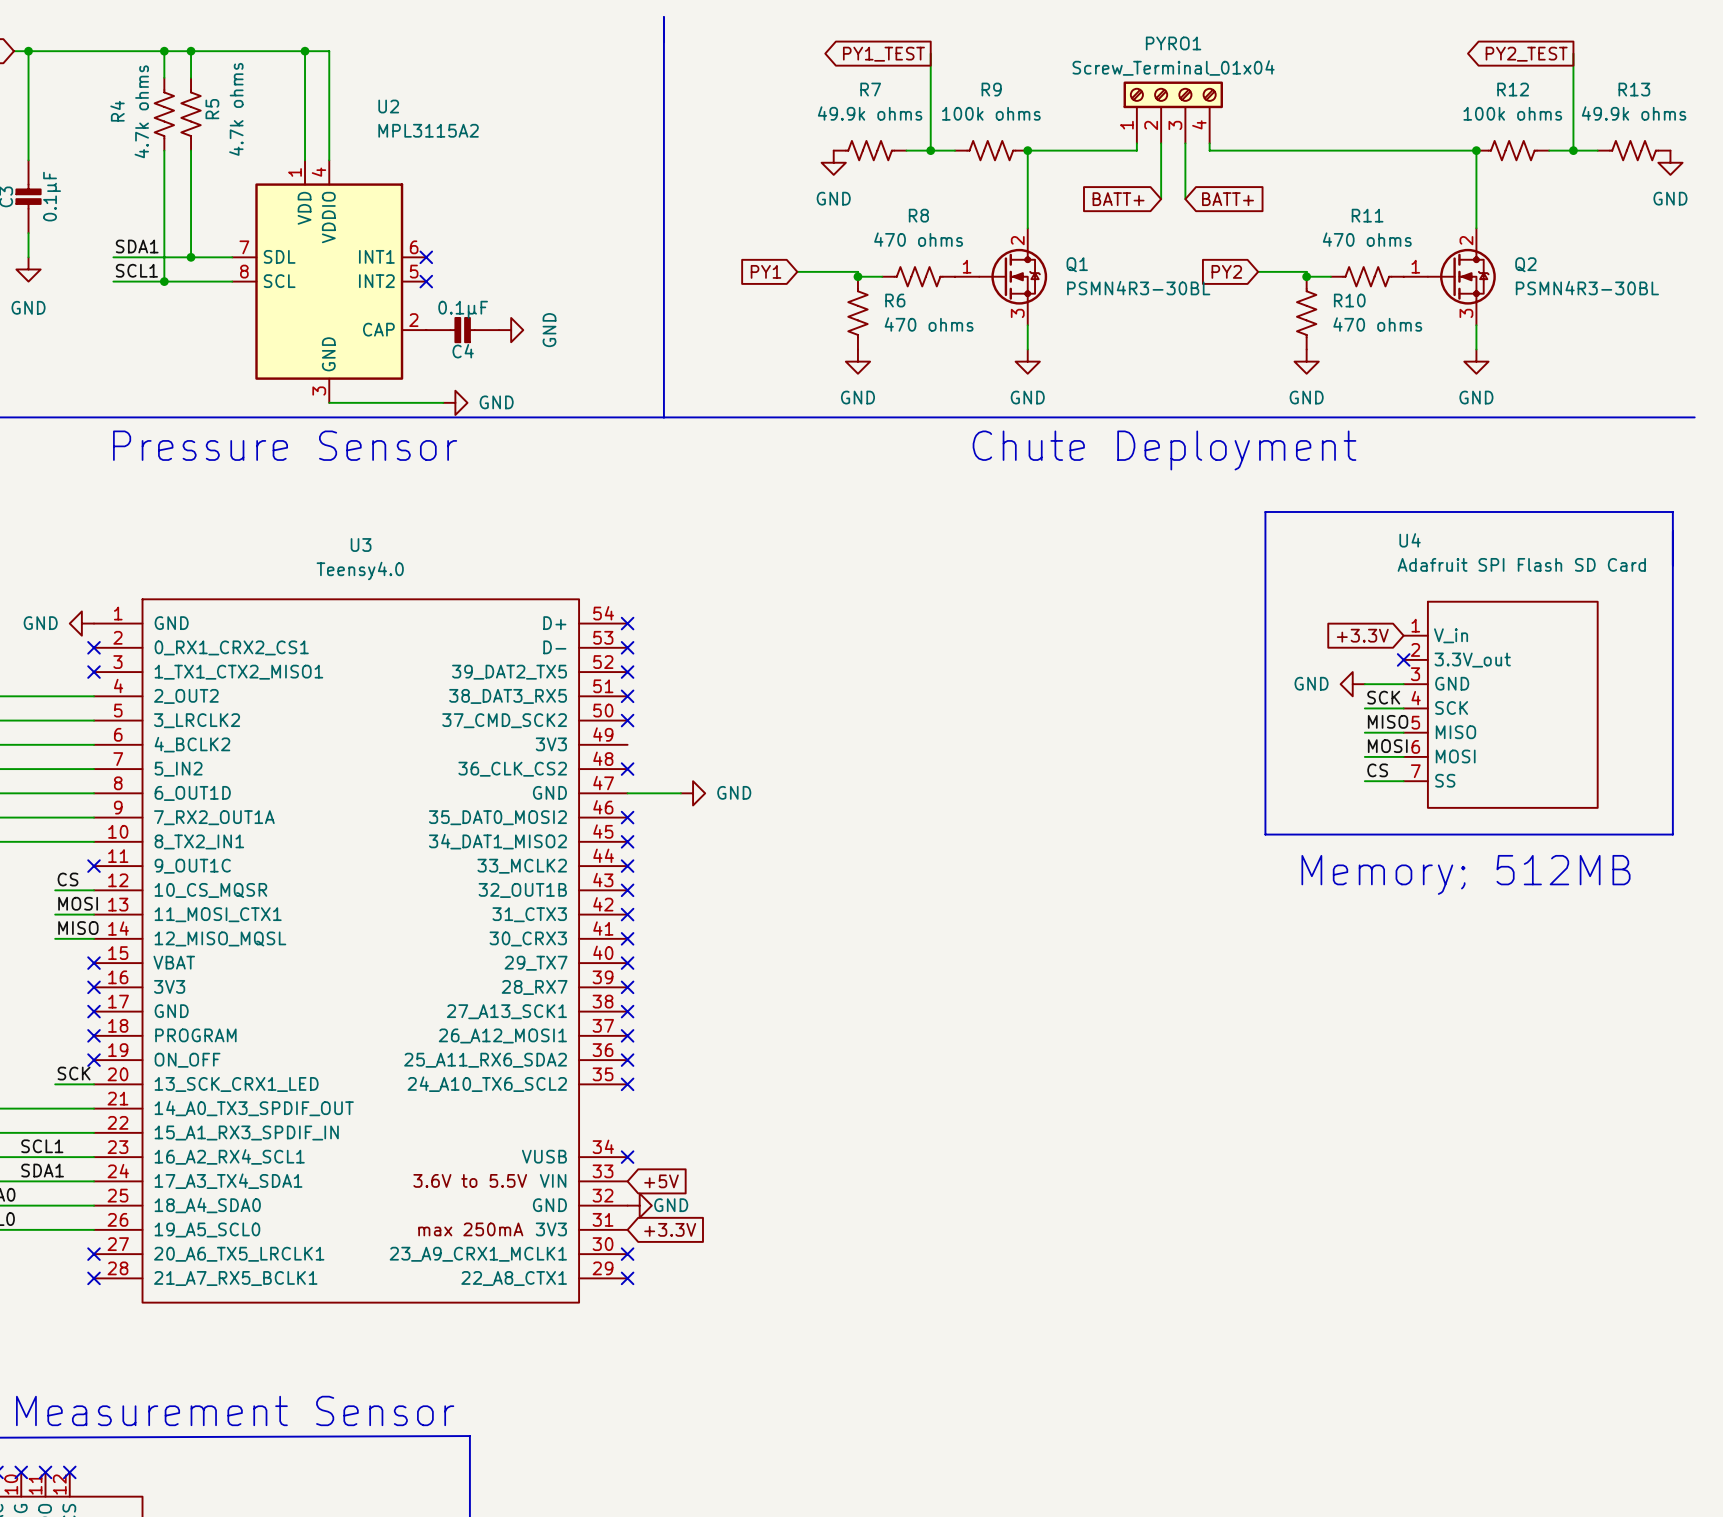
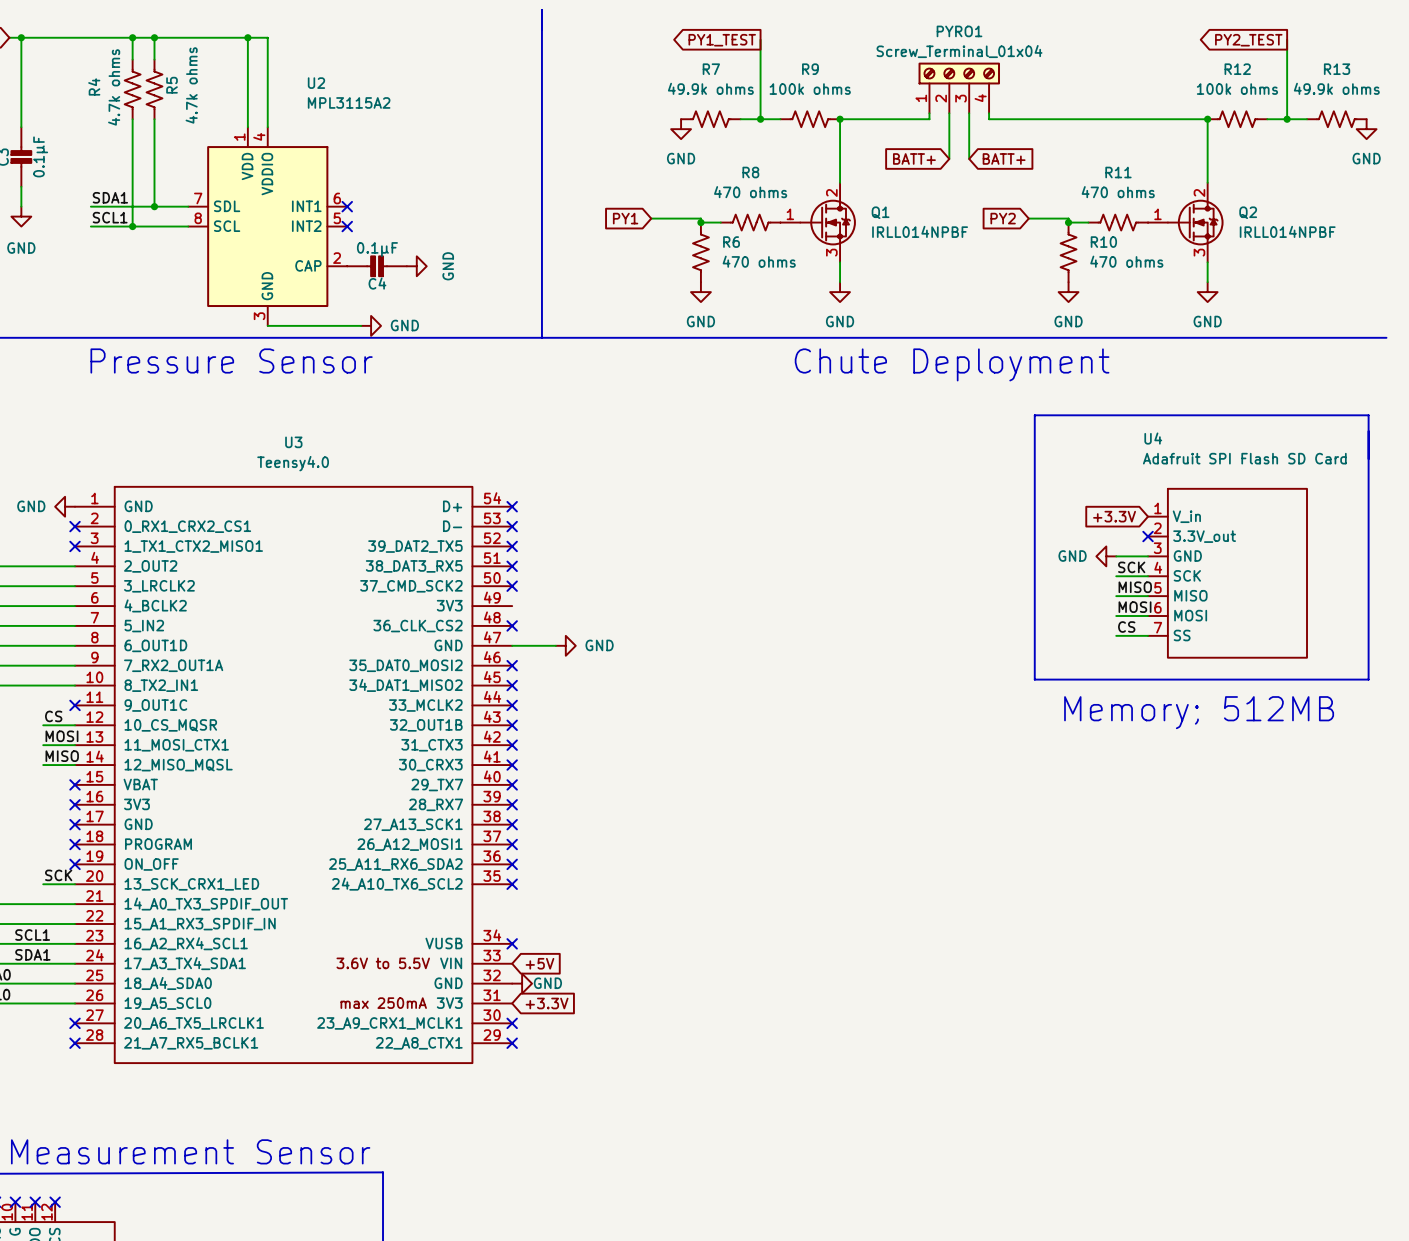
Q1 value: PSMN4R3-30BL (1138, 288) -> IRLL014NPBF (920, 231)
Q2 value: PSMN4R3-30BL (1587, 288) -> IRLL014NPBF (1287, 231)

